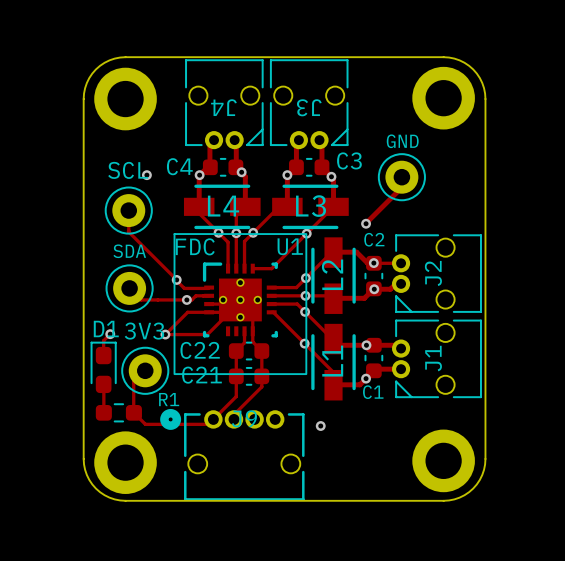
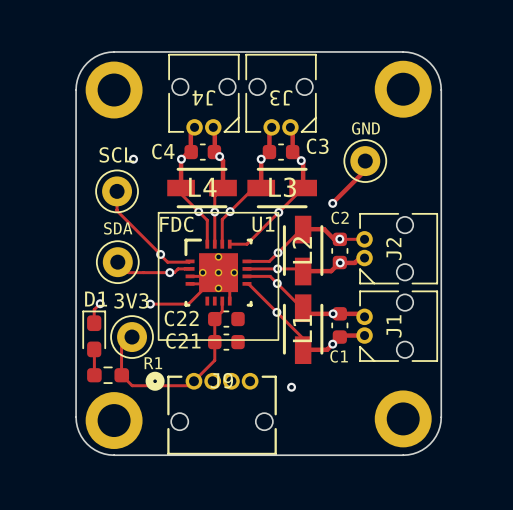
track: (209, 312) (187, 312) (165, 334) -> none
track: (252, 331) (252, 341) (261, 351) (261, 386) (233, 414) (233, 419) -> none

